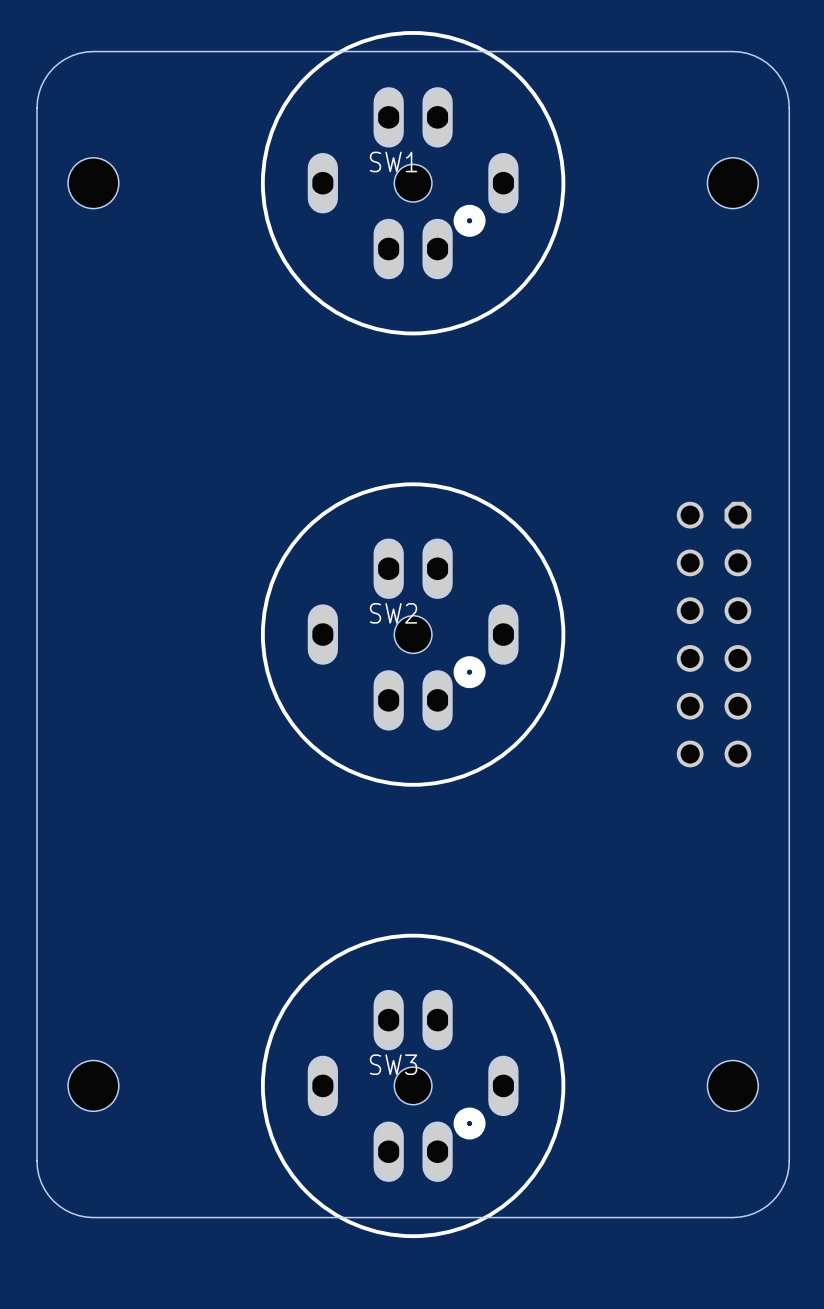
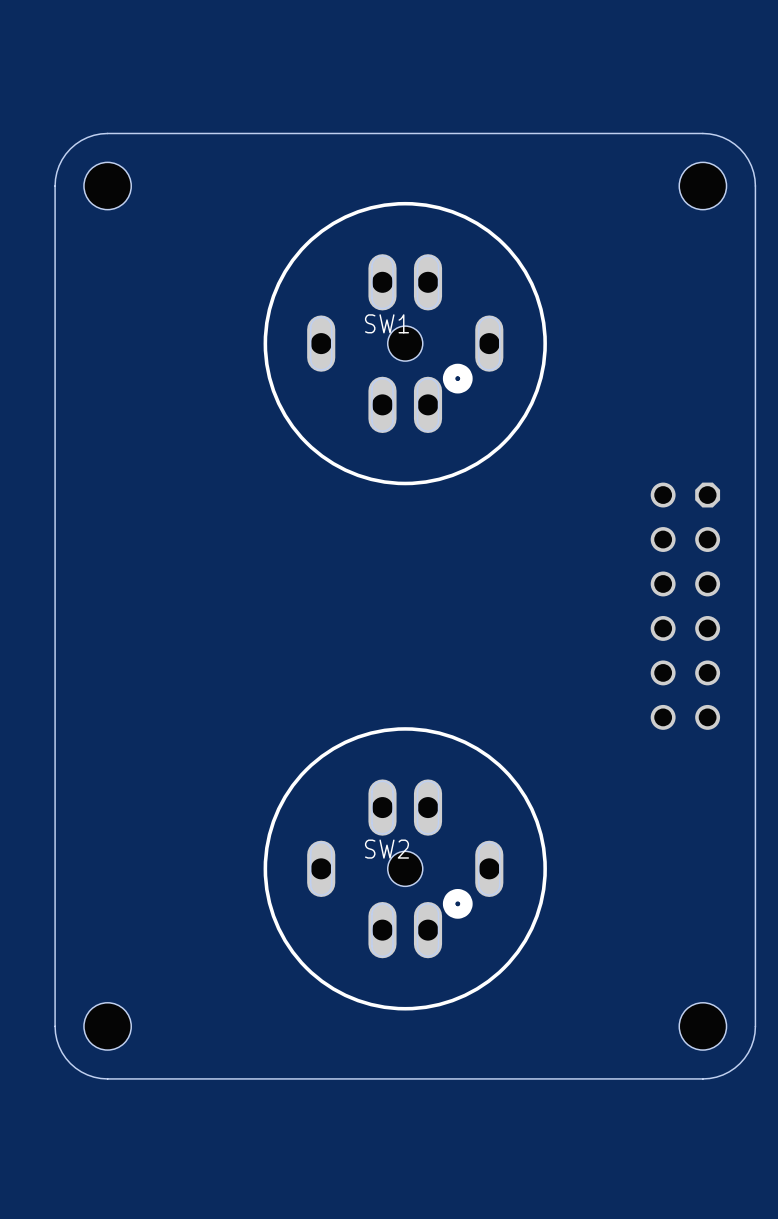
hole: (413, 183) -> none
SW1 position: (413, 183) -> (405, 343)
board edge: (789, 183) (789, 107) (784, 86) (777, 73) (767, 63) (747, 53) (732, 51) (86, 52) (71, 55) (59, 63) (48, 73) (41, 86) (37, 107) (37, 183) -> (755, 186) (751, 165) (740, 148) (722, 137) (702, 133) (100, 133) (81, 140) (65, 154) (56, 172) (55, 186)
hole: none -> (405, 343)
hole: (413, 634) -> none
SW2 position: (413, 634) -> (405, 868)
hole: none -> (405, 868)
hole: (413, 1085) -> none
SW3: (413, 1085) -> none
board edge: (789, 1085) (789, 1161) (784, 1182) (777, 1195) (767, 1205) (747, 1215) (732, 1217) (86, 1217) (71, 1213) (59, 1205) (48, 1195) (41, 1182) (37, 1161) (37, 1085) -> (755, 1026) (751, 1046) (740, 1063) (722, 1074) (702, 1078) (100, 1078) (81, 1071) (65, 1058) (56, 1040) (55, 1026)

